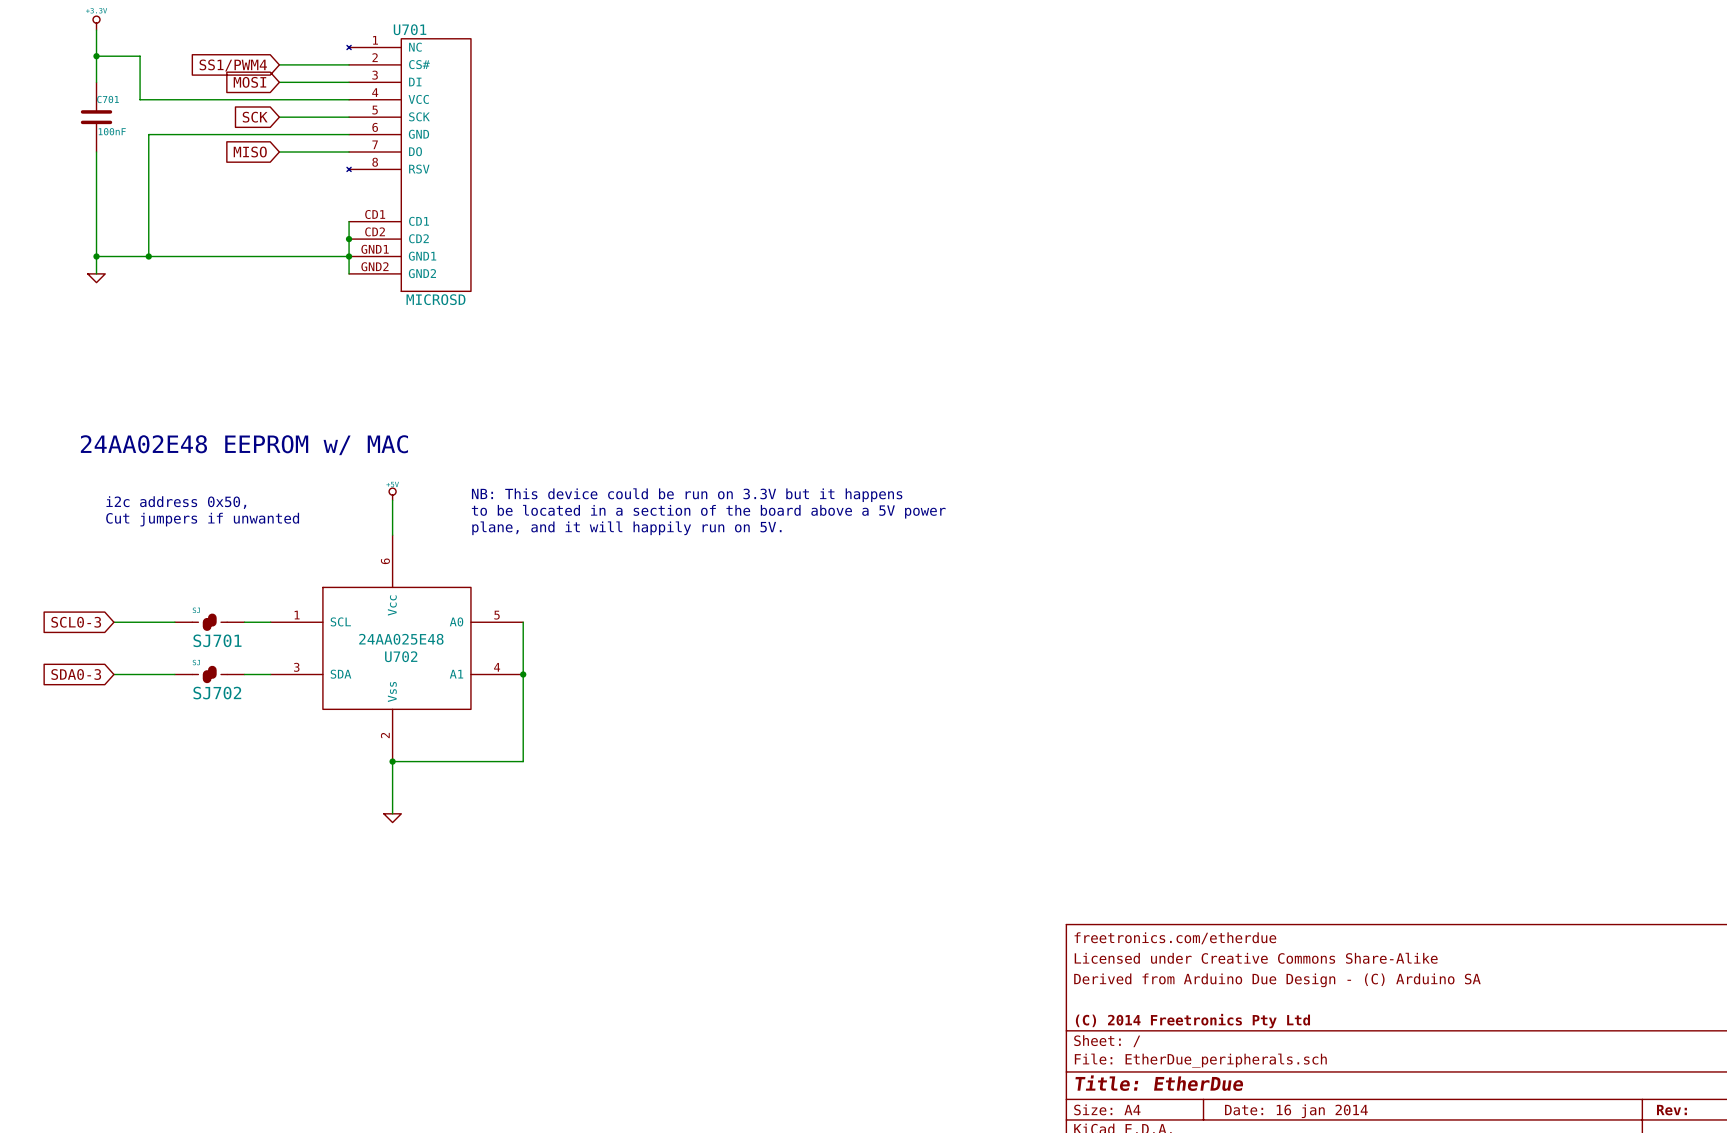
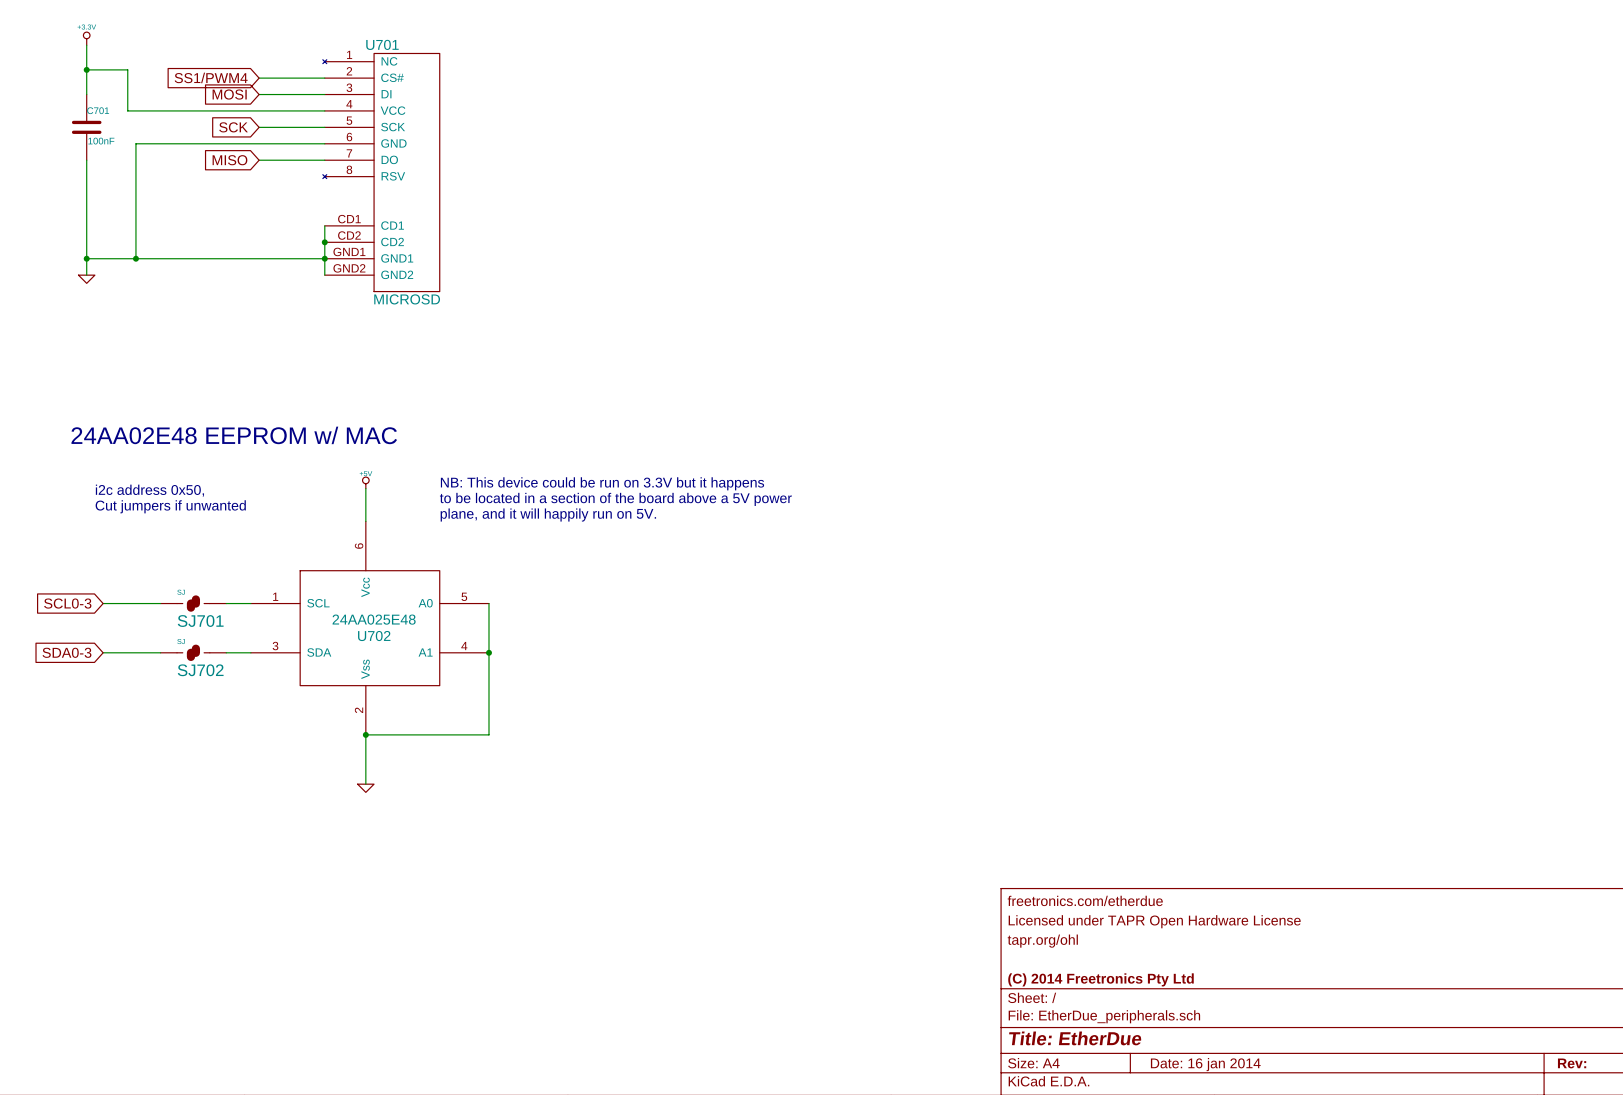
title block: Licensed under Creative Commons Share-Alike (1256, 958) -> Licensed under TAPR Open Hardware License (1154, 921)
title block: Derived from Arduino Due Design - (C) Arduino SA (1277, 980) -> tapr.org/ohl (1042, 941)

